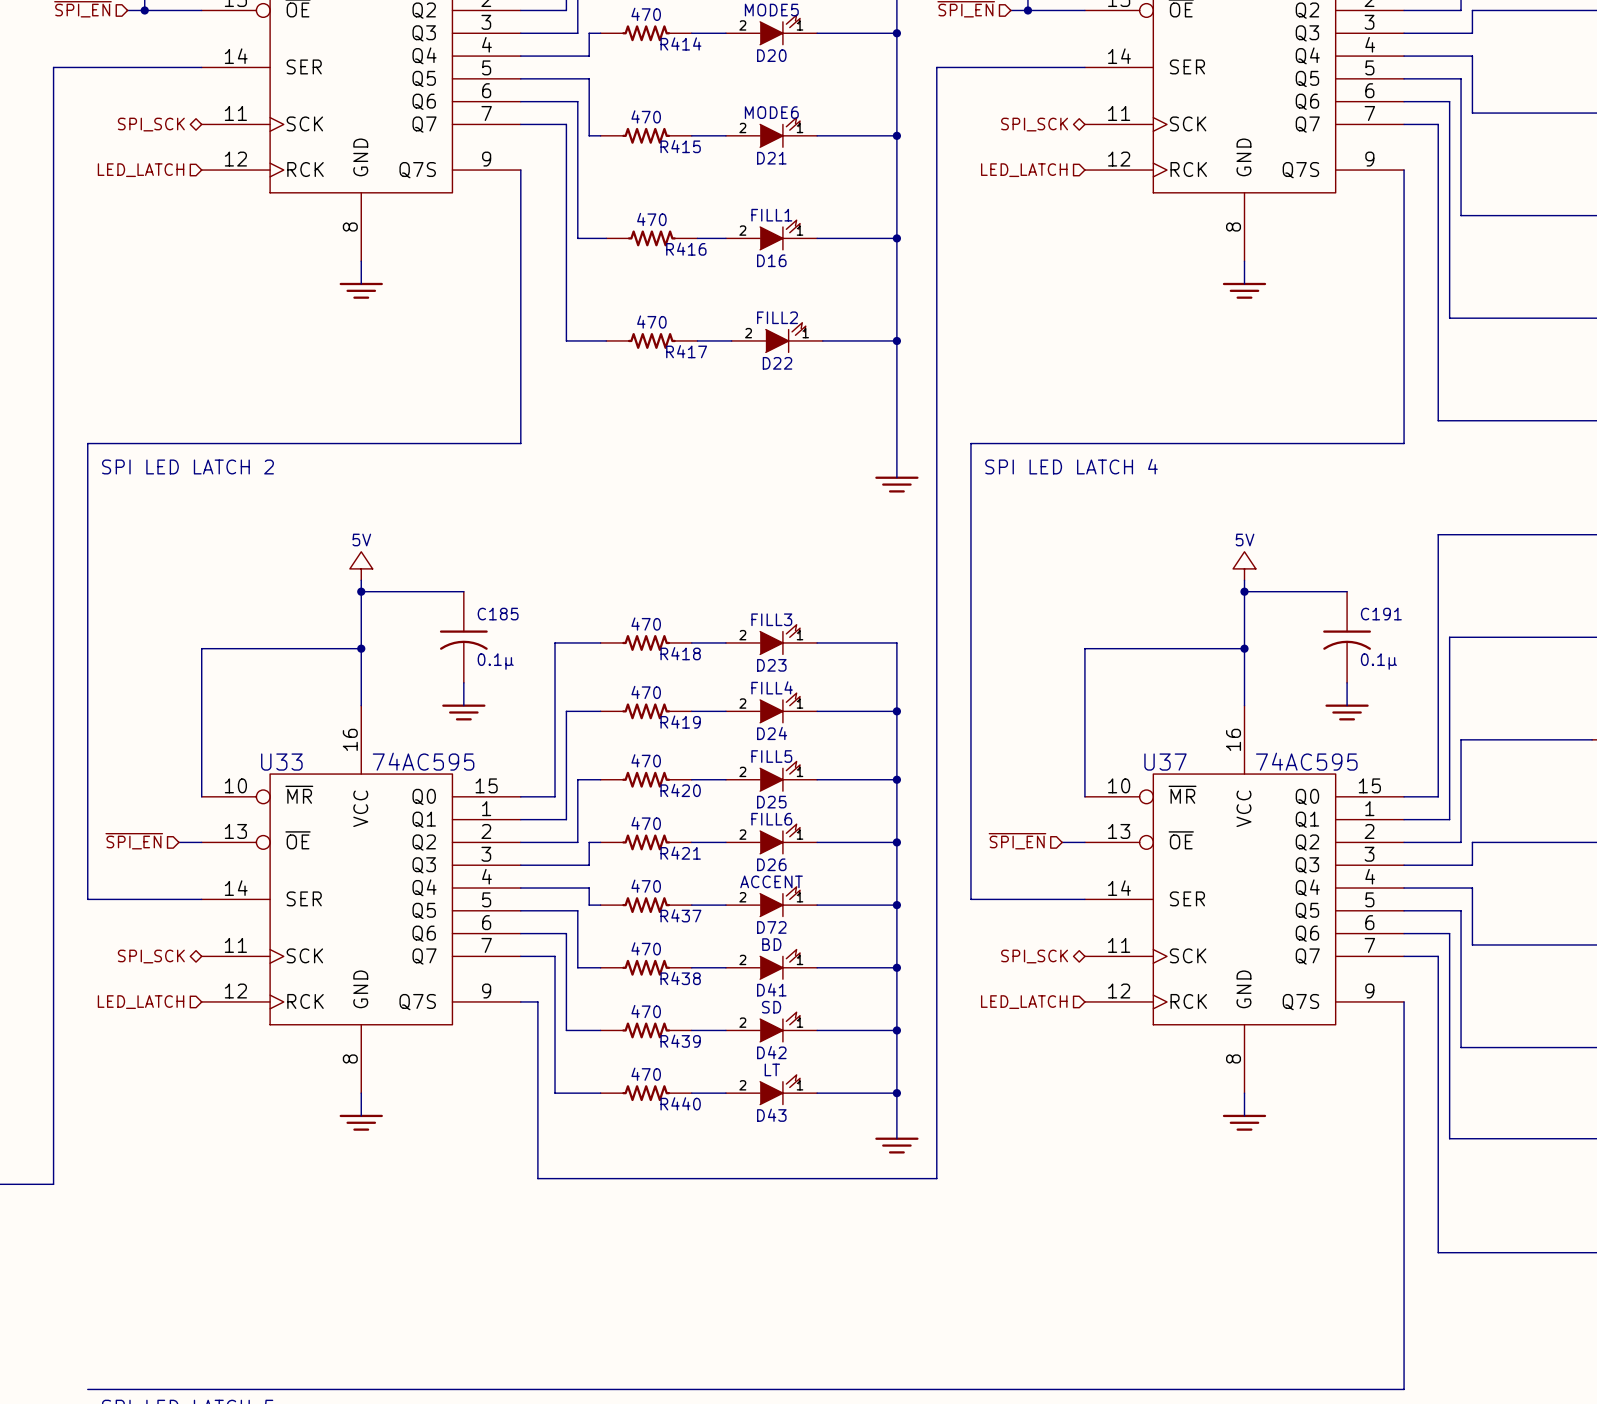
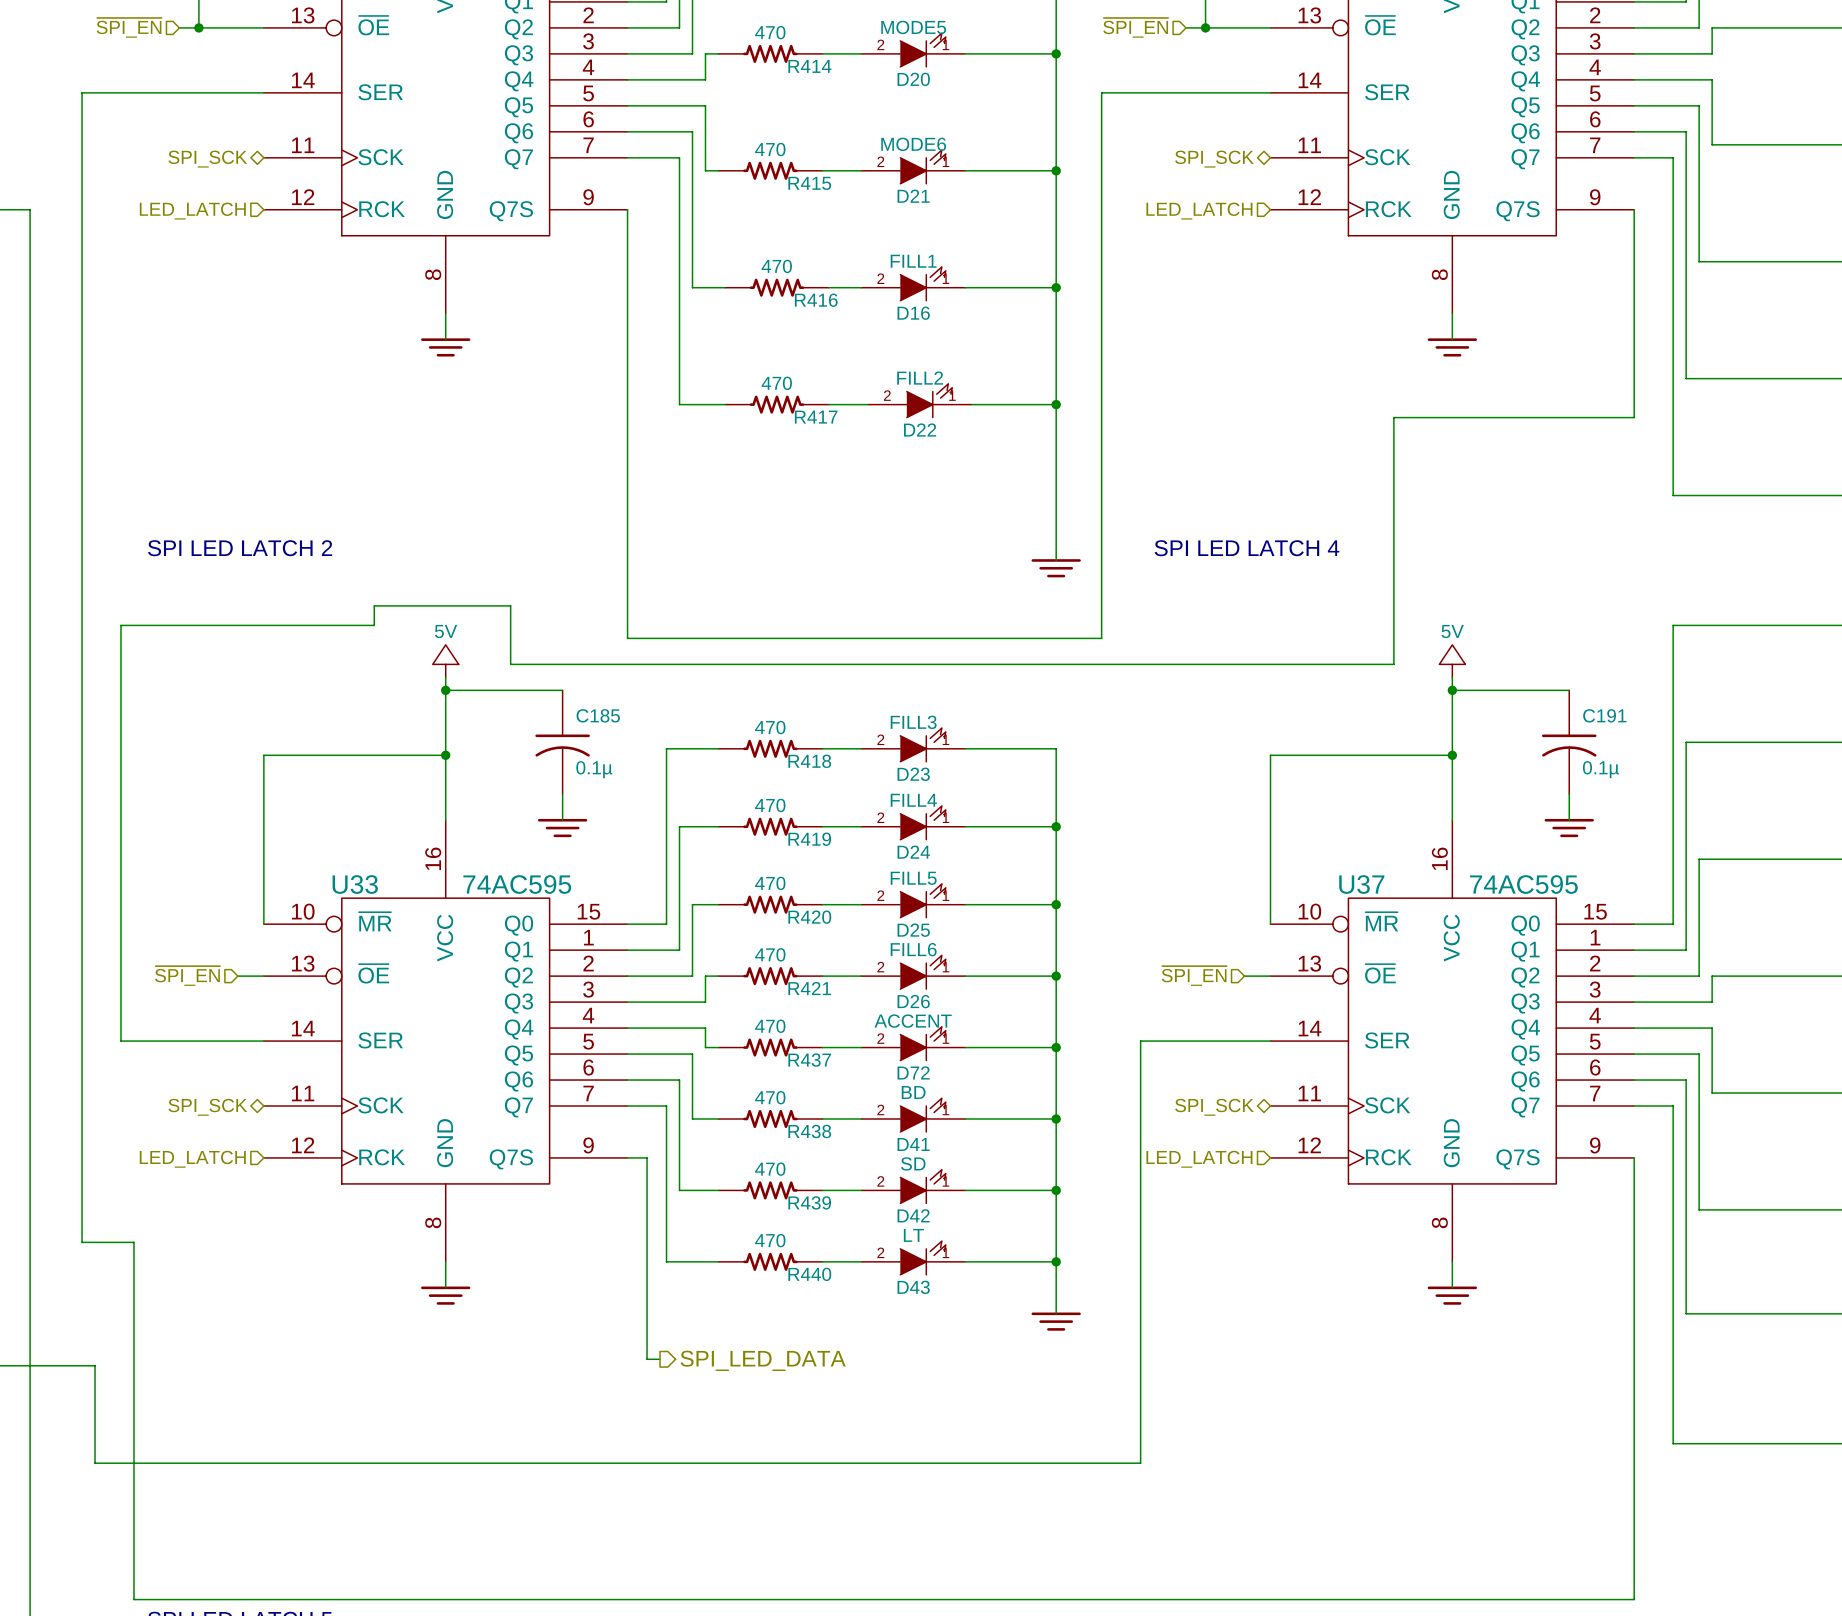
wire: (53, 67) (53, 1184) -> (95, 92) (82, 92) (82, 1242) (133, 1242) (133, 1599)
wire: (1404, 352) (1404, 443) (970, 443) (970, 899) -> (1634, 417) (1393, 417) (1393, 664) (510, 664) (510, 605) (374, 605) (374, 625) (120, 625) (120, 1041) (133, 1041)
wire: (520, 443) (87, 443) (87, 899) -> none
wire: (936, 546) (936, 1178) (549, 1178) -> (1101, 638) (627, 638) (627, 521)
wire: none -> (1140, 1041) (1140, 1463) (95, 1463) (95, 1365)
hierarchical label: none -> SPI_LED_DATA (763, 1360)

